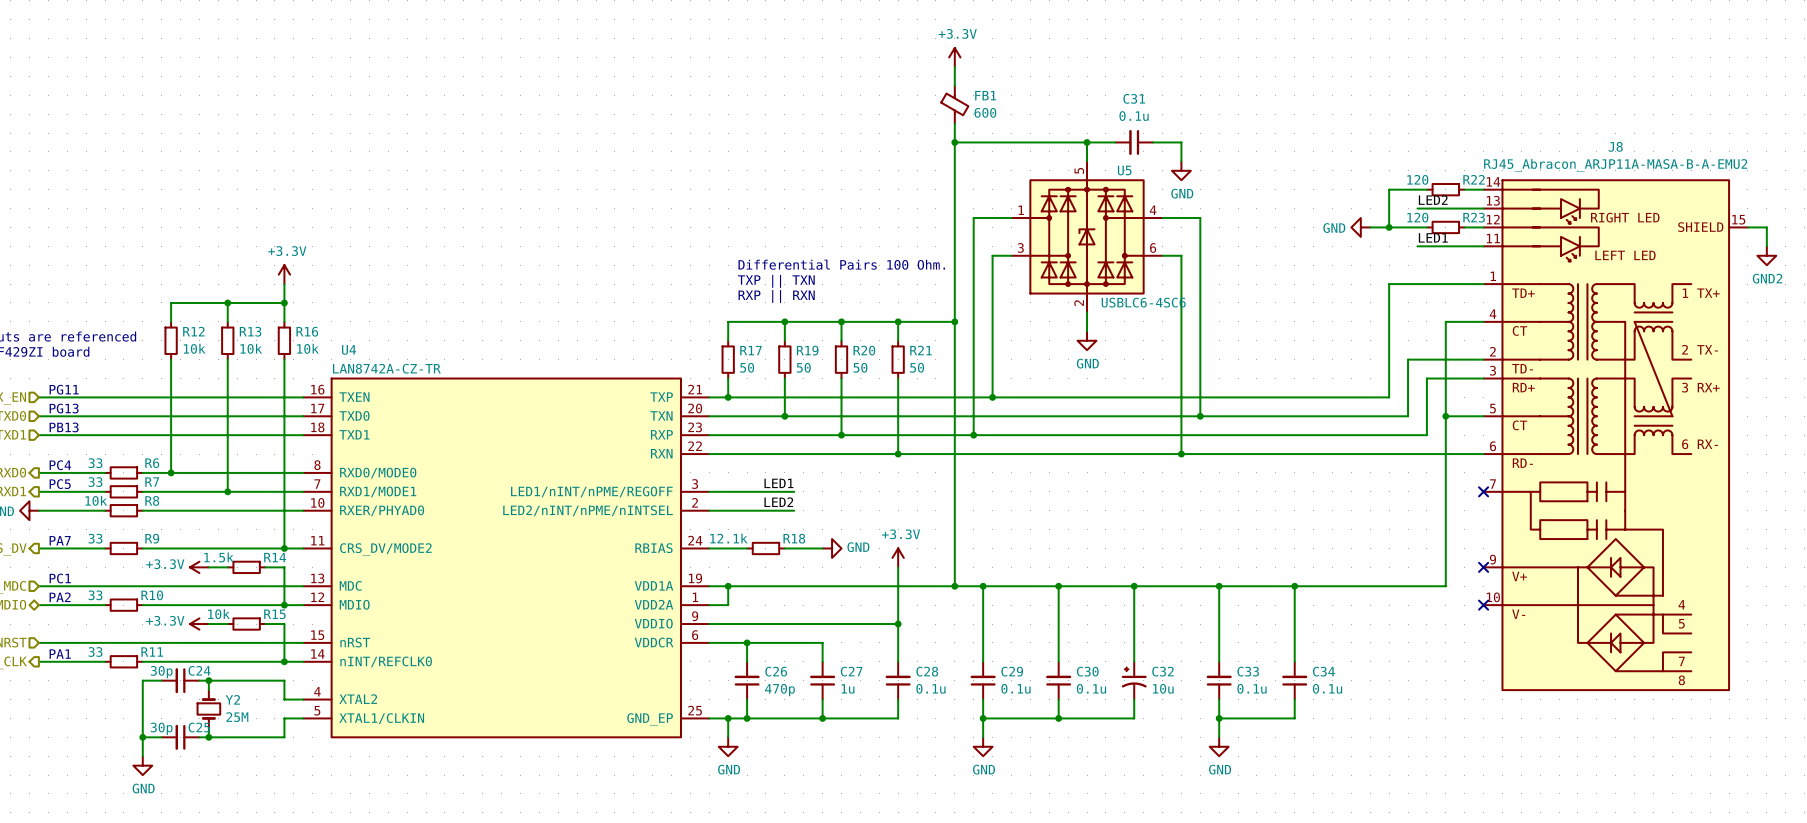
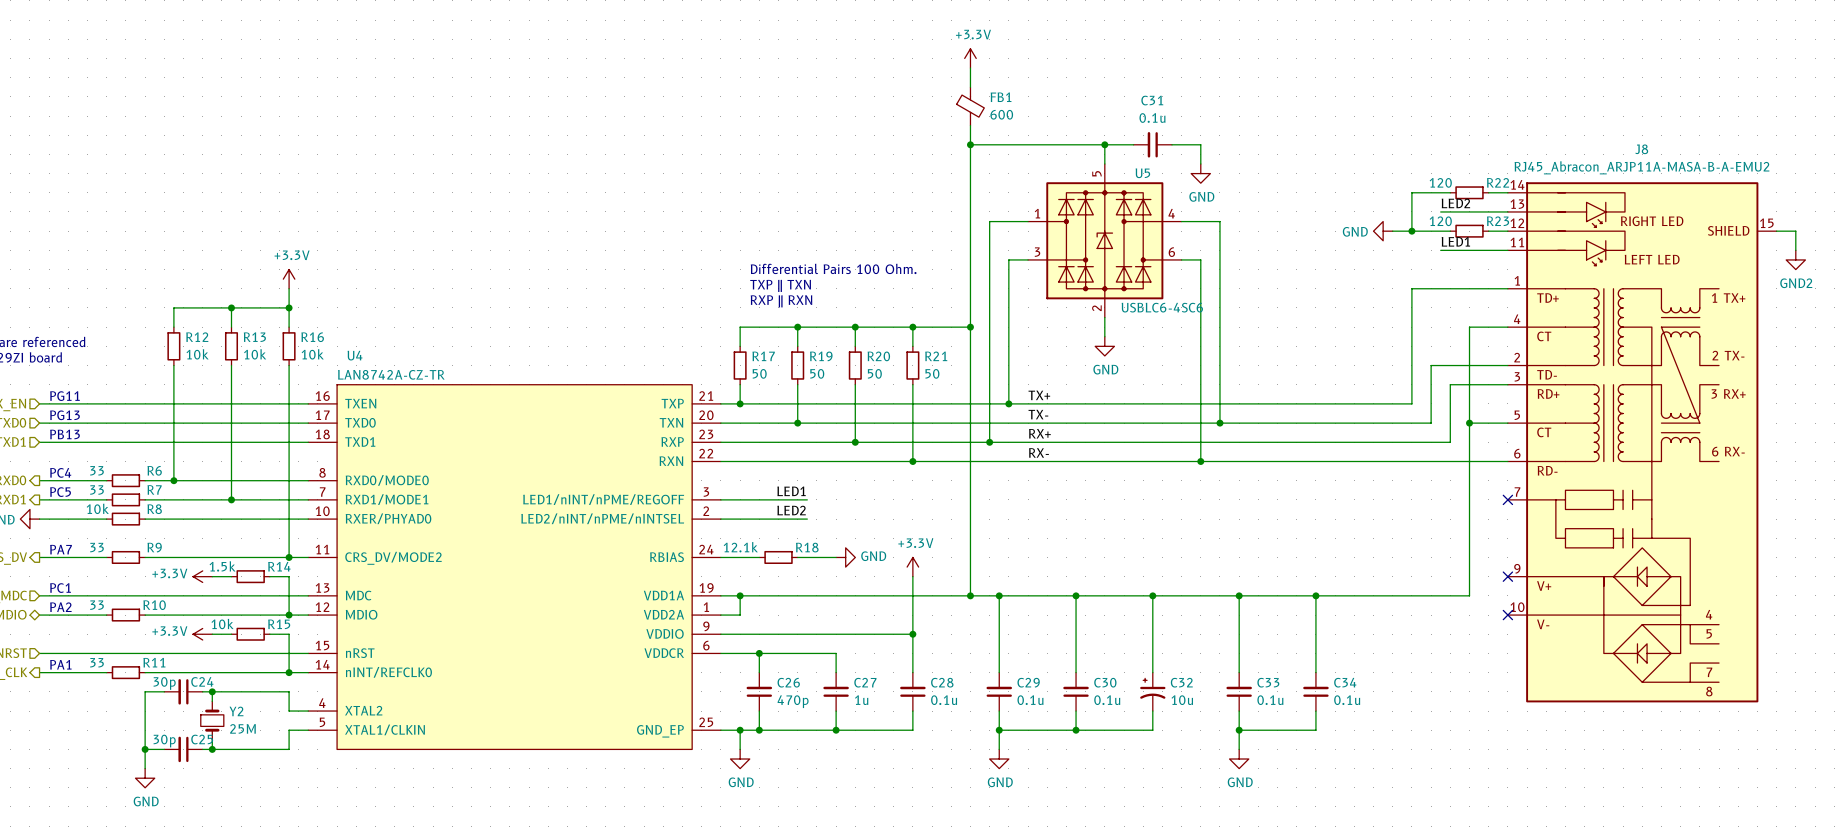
label: none -> TX+ (1039, 395)
label: none -> TX- (1038, 414)
label: none -> RX+ (1039, 433)
label: none -> RX- (1038, 452)

